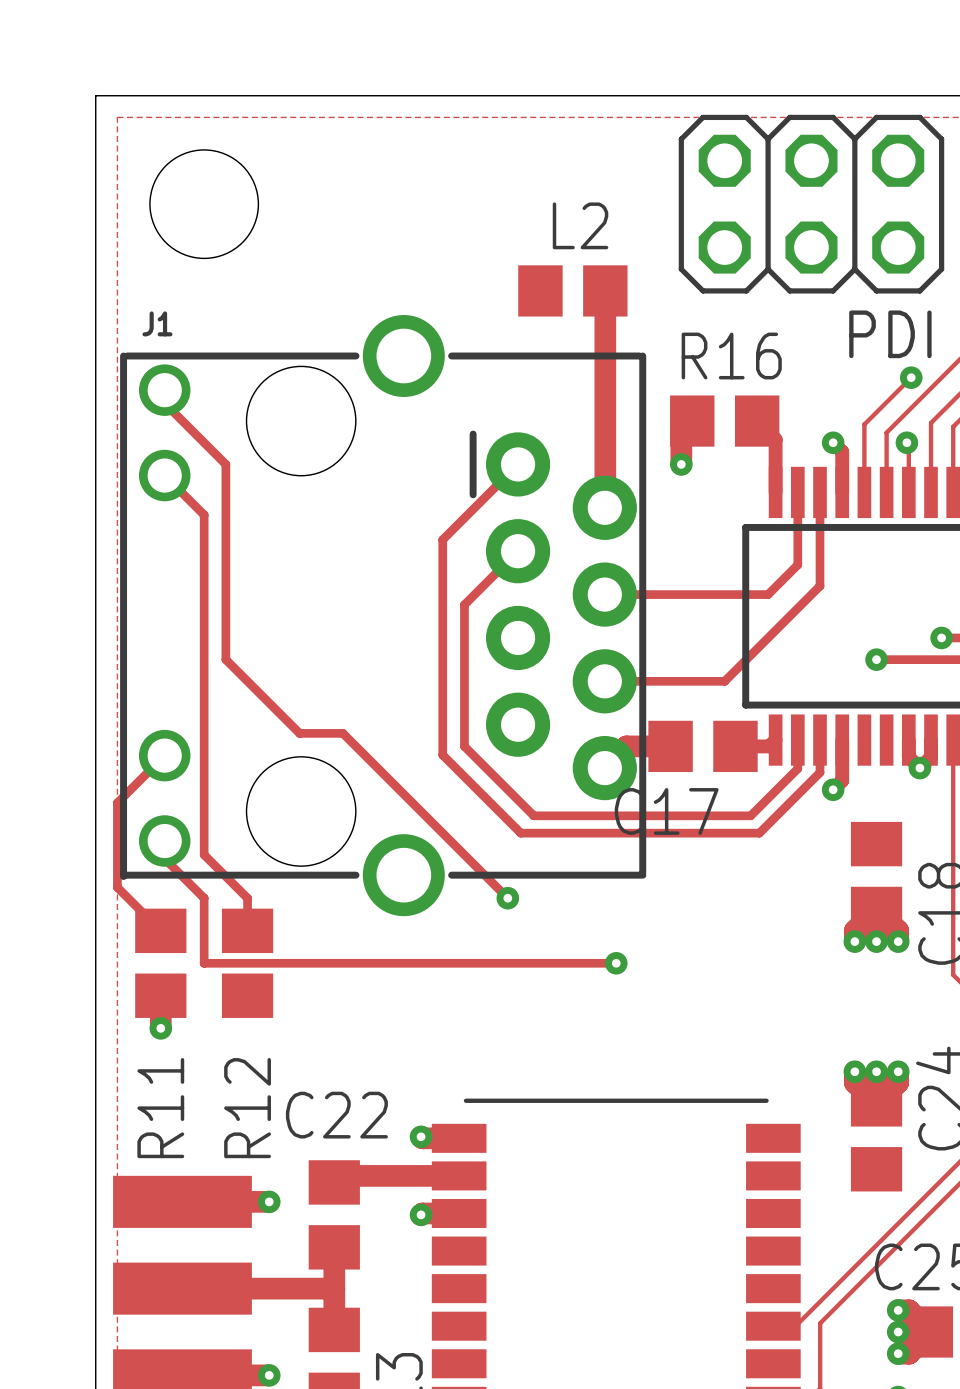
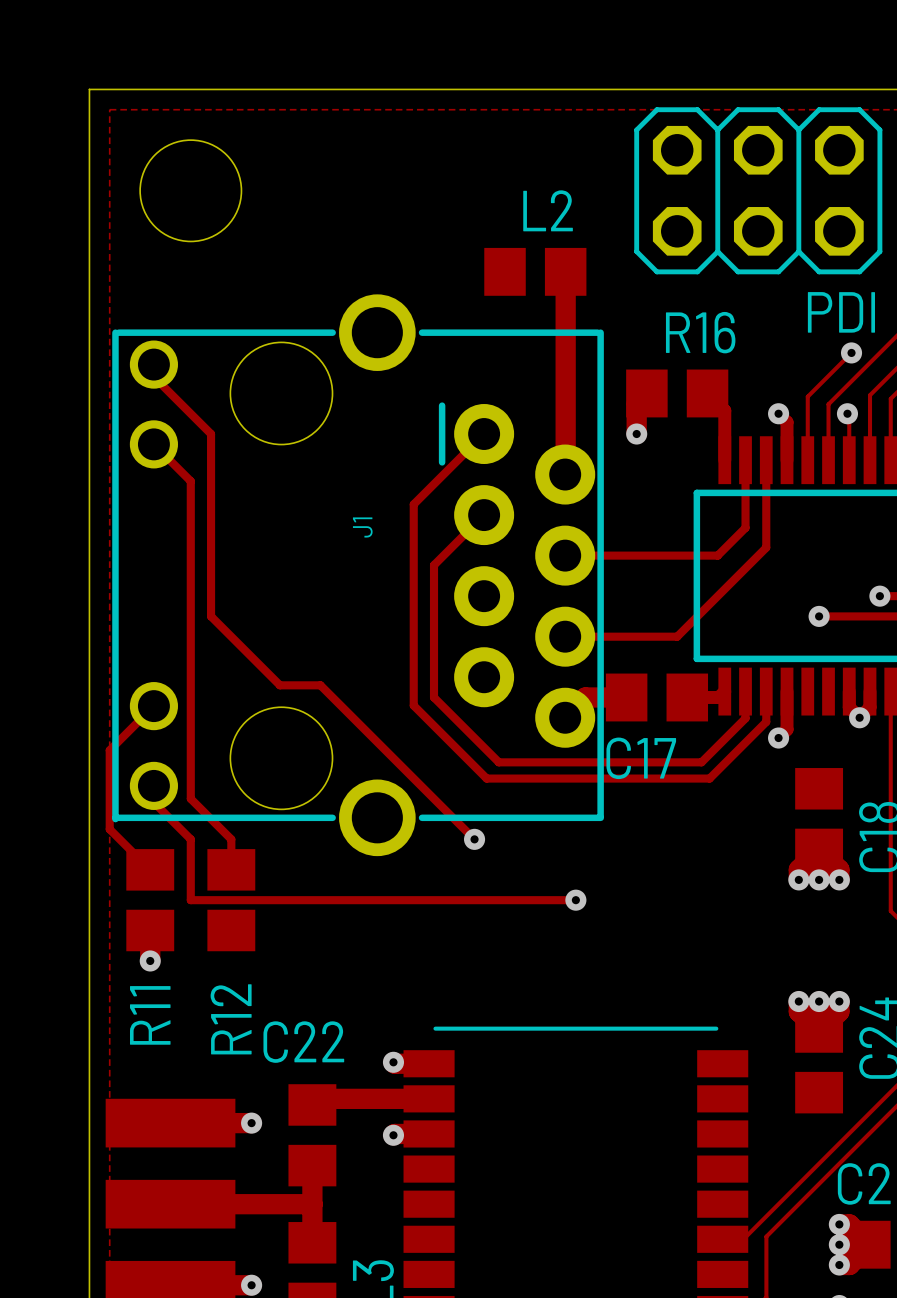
J1 name rotation: 0° (157, 323) -> 90° counterclockwise (362, 527)
J1 name position: J1 (157, 323) -> J1 (362, 527)

